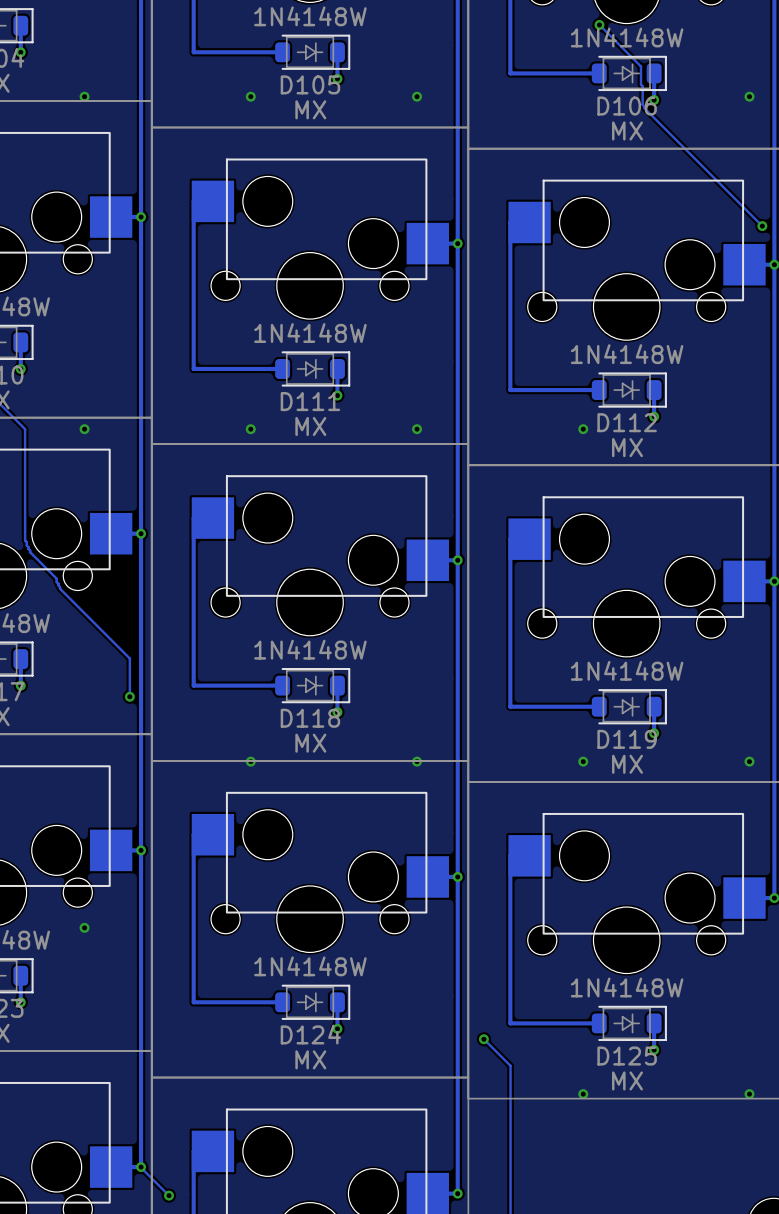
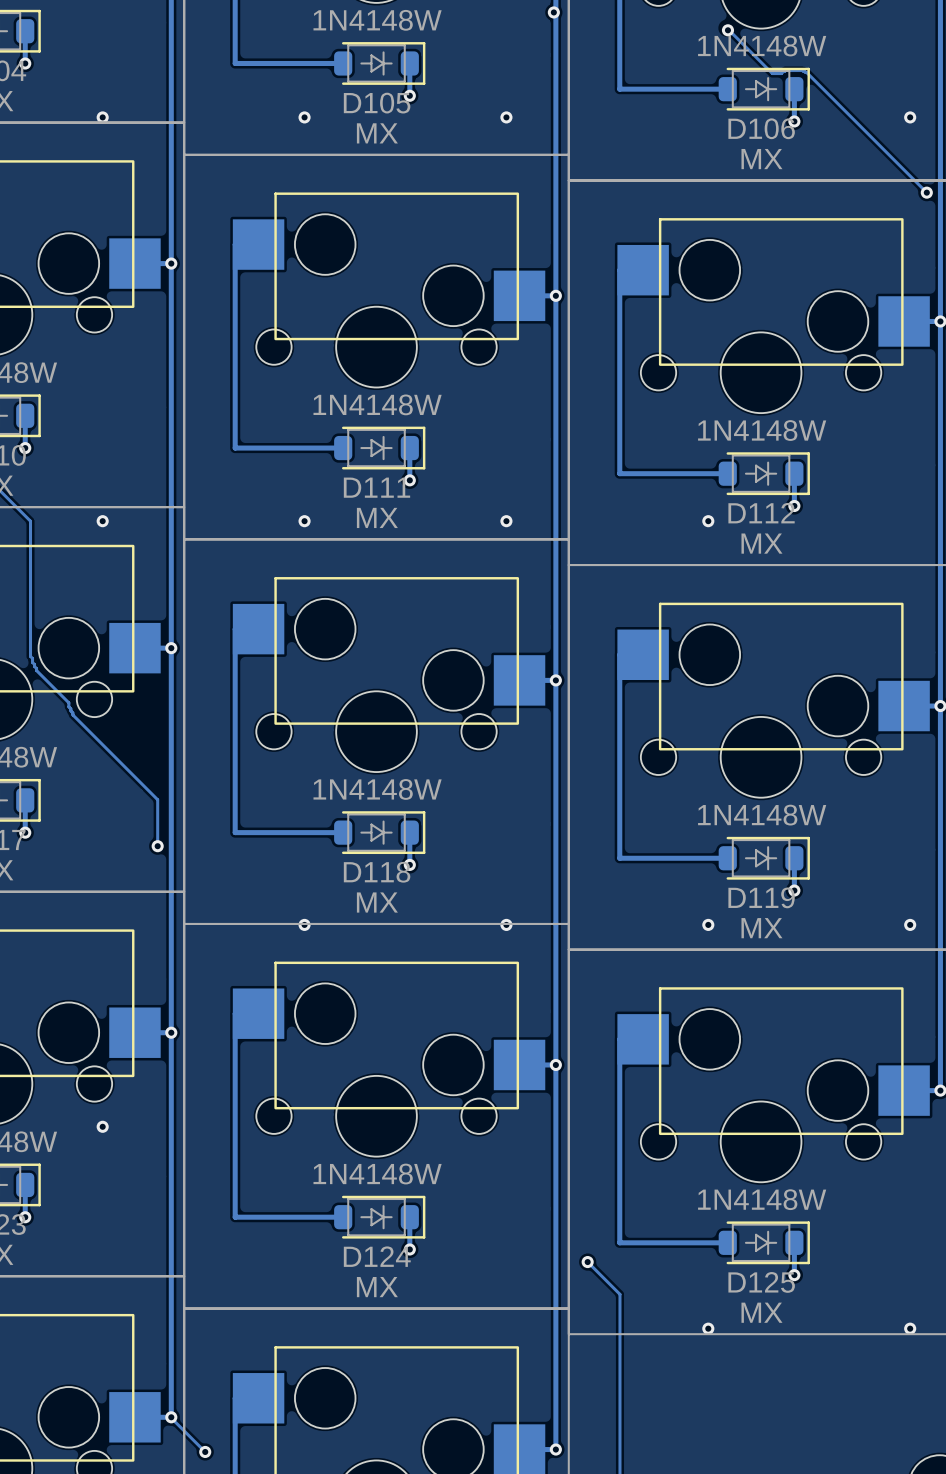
via: none -> (553, 12)
track: none -> (726, 28) (772, 73) (781, 73) (785, 70) (802, 70) (806, 72) (926, 192)
track: (599, 24) (641, 66) (644, 108) (762, 226) -> none
via position: (762, 226) -> (926, 192)

